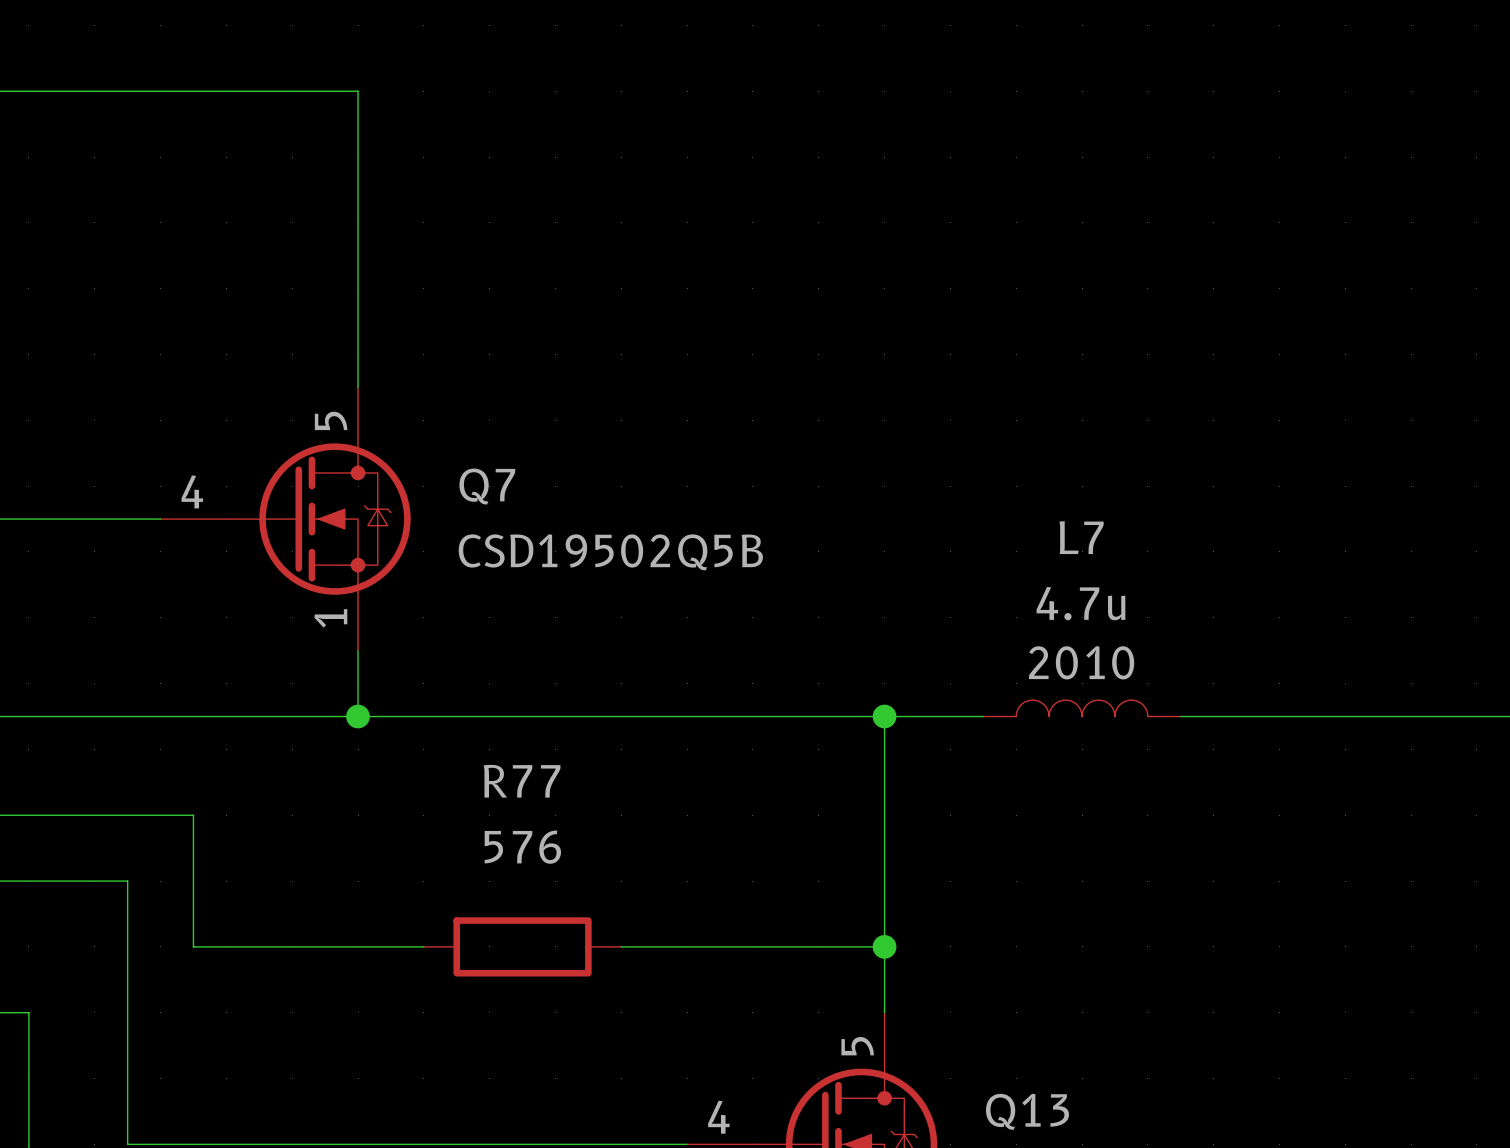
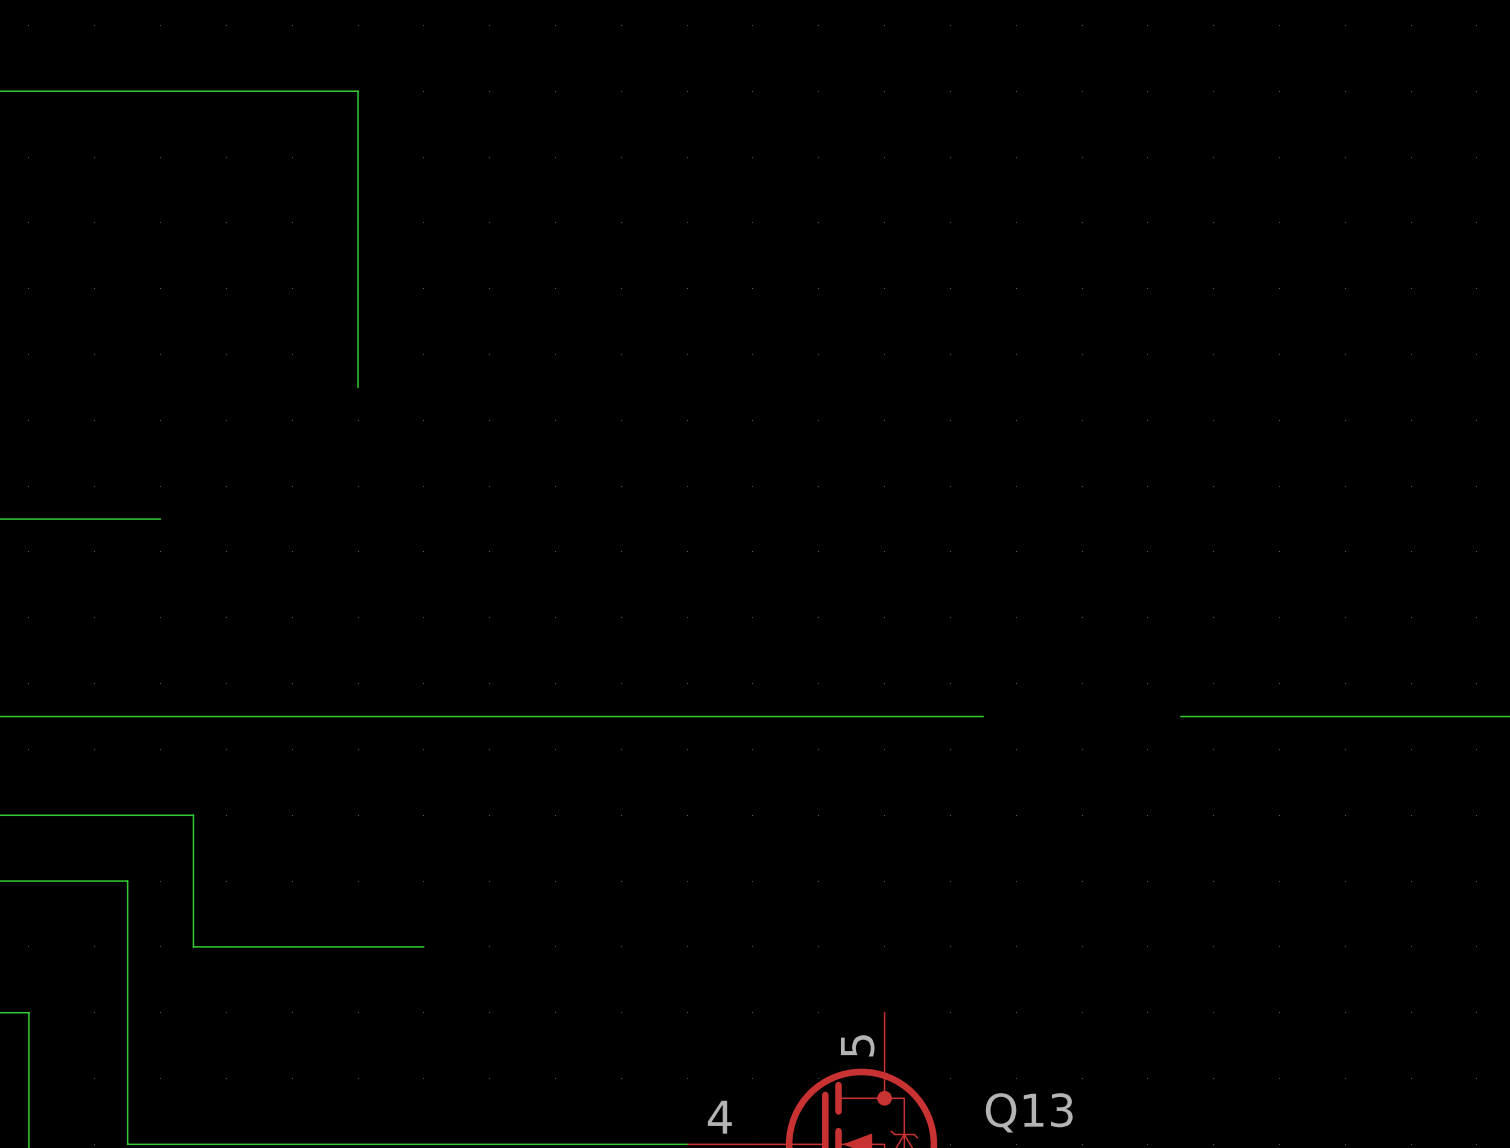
Q7: CSD19502Q5B (285, 519) -> none
wire: (358, 650) (358, 716) -> none
L7: 4.7u (1082, 708) -> none
junction: (358, 716) -> none
wire: (884, 716) (884, 1012) -> none
junction: (884, 716) -> none
R77: (522, 946) -> none
wire: (621, 946) (884, 946) -> none
junction: (884, 946) -> none

